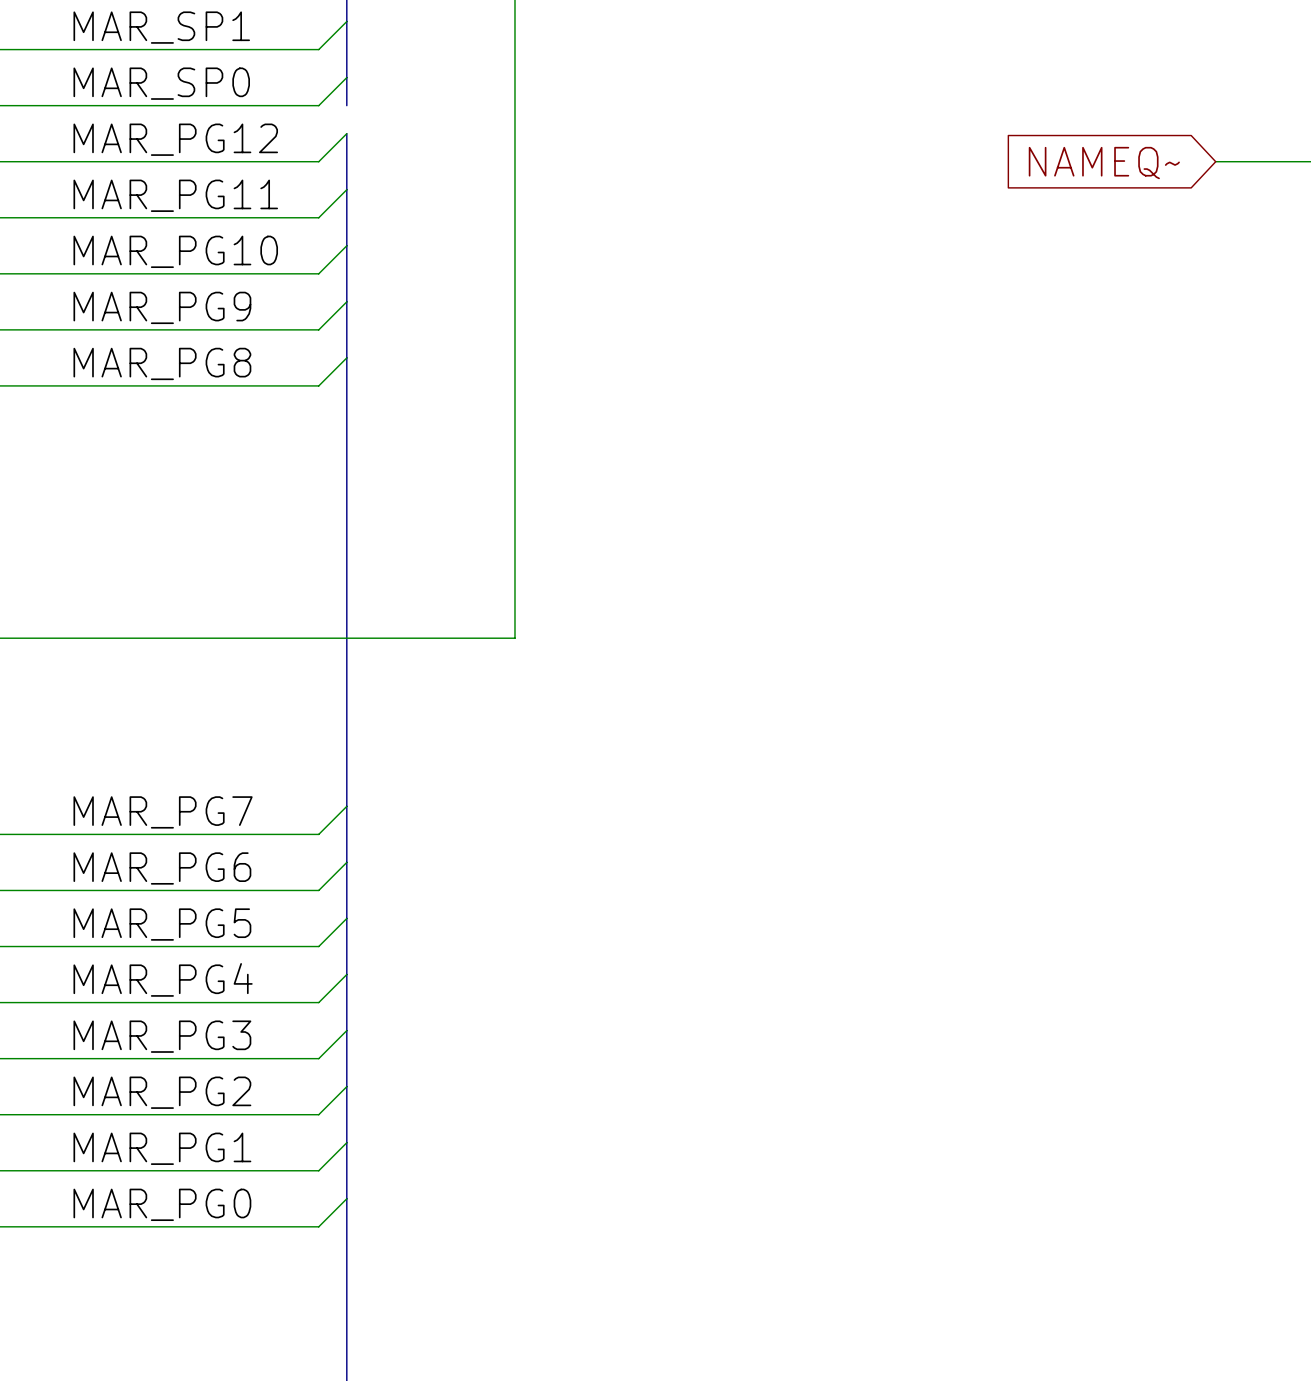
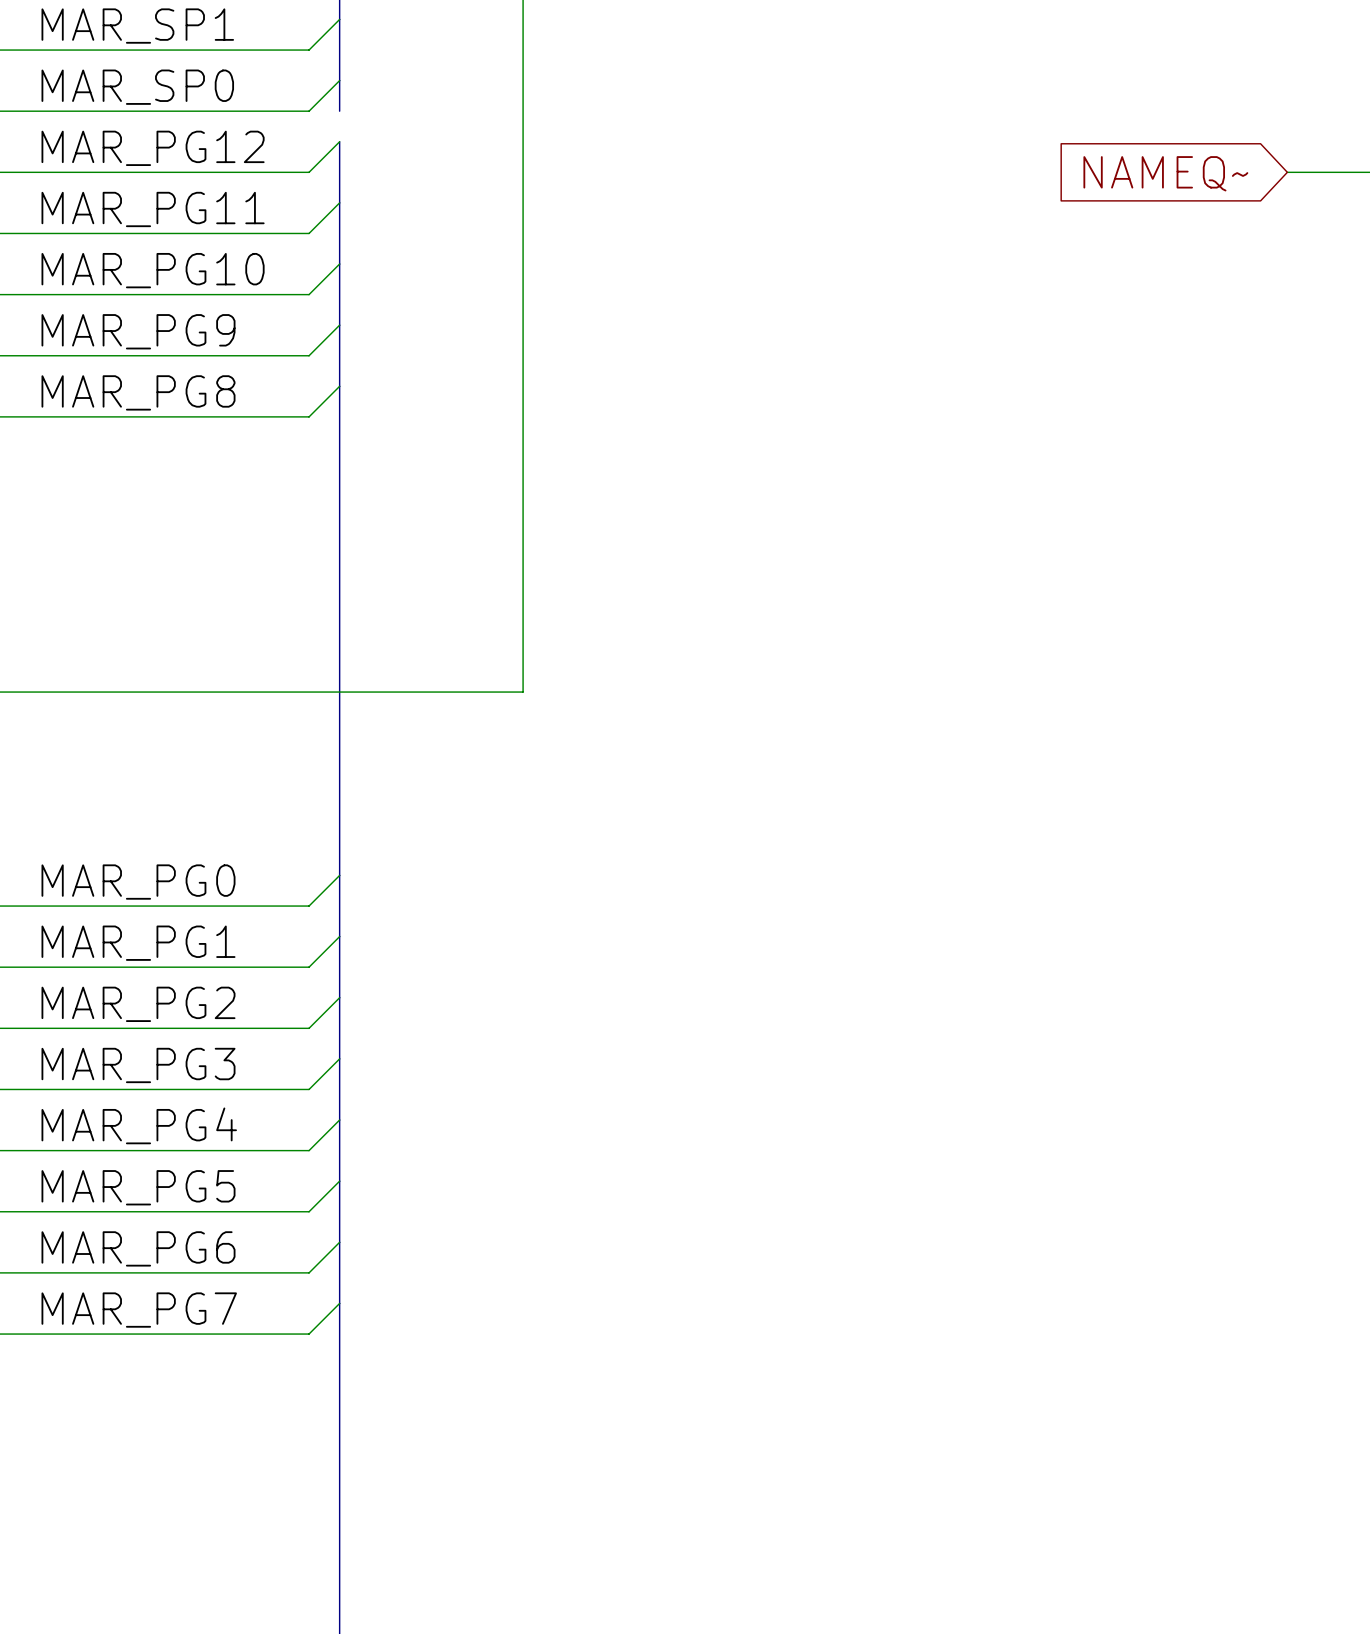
label: MAR_PG7 (163, 812) -> MAR_PG0 (138, 882)
label: MAR_PG6 (162, 868) -> MAR_PG1 (138, 943)
label: MAR_PG5 (162, 924) -> MAR_PG2 (138, 1004)
label: MAR_PG4 (163, 979) -> MAR_PG3 (138, 1065)
label: MAR_PG3 (162, 1036) -> MAR_PG4 (139, 1125)
label: MAR_PG2 (162, 1092) -> MAR_PG5 (138, 1187)
label: MAR_PG1 (162, 1148) -> MAR_PG6 (138, 1248)
label: MAR_PG0 (162, 1204) -> MAR_PG7 (139, 1310)

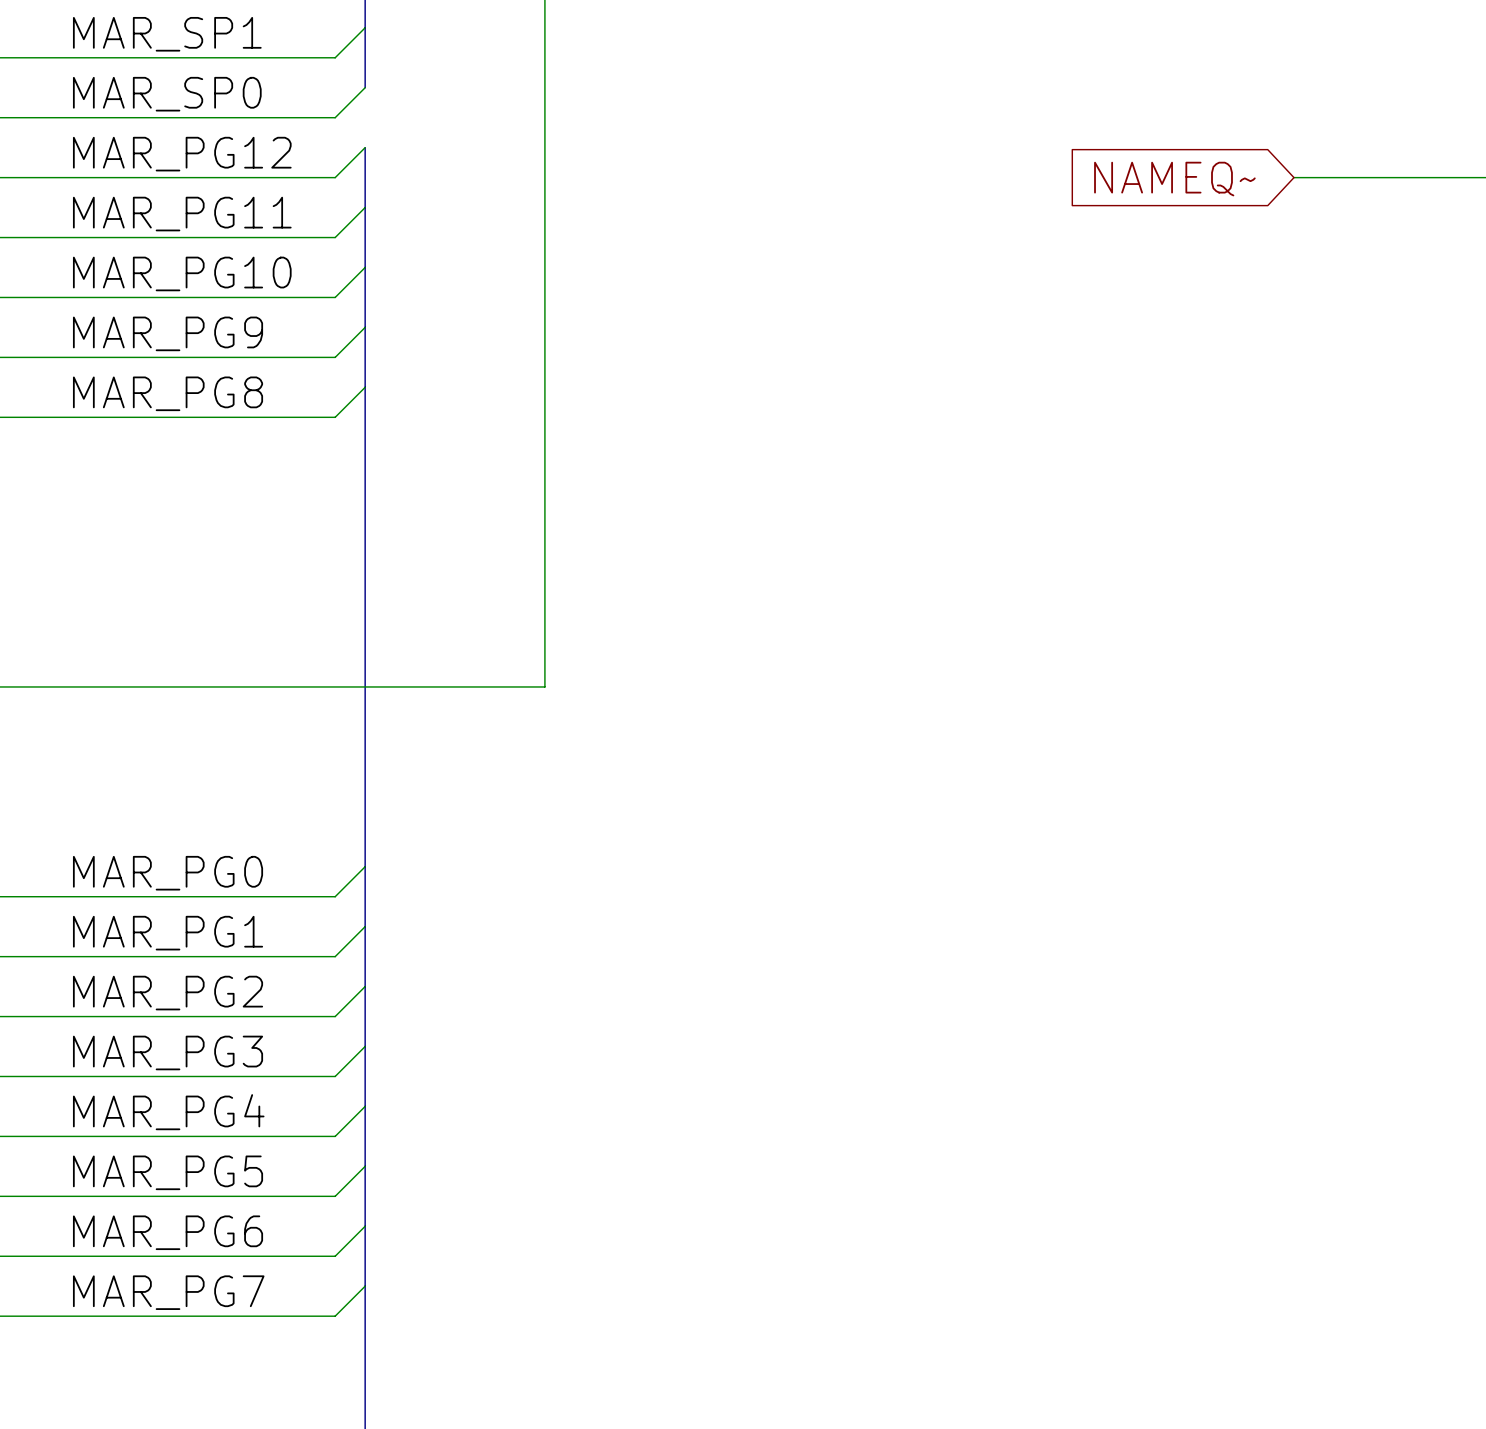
bus: (339, 80) (339, 111) -> none

